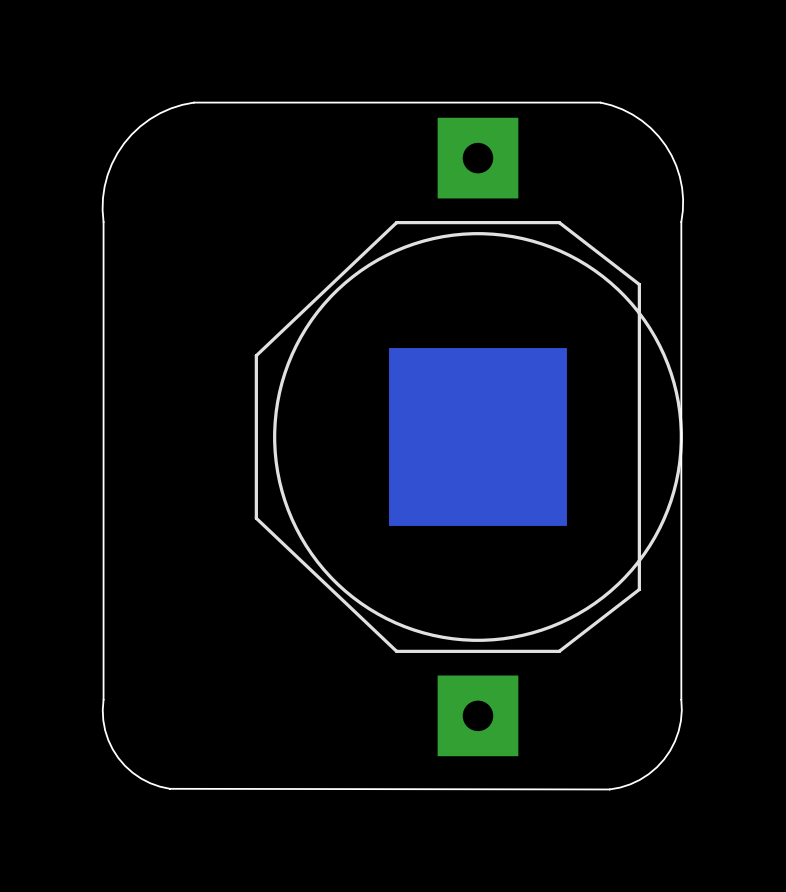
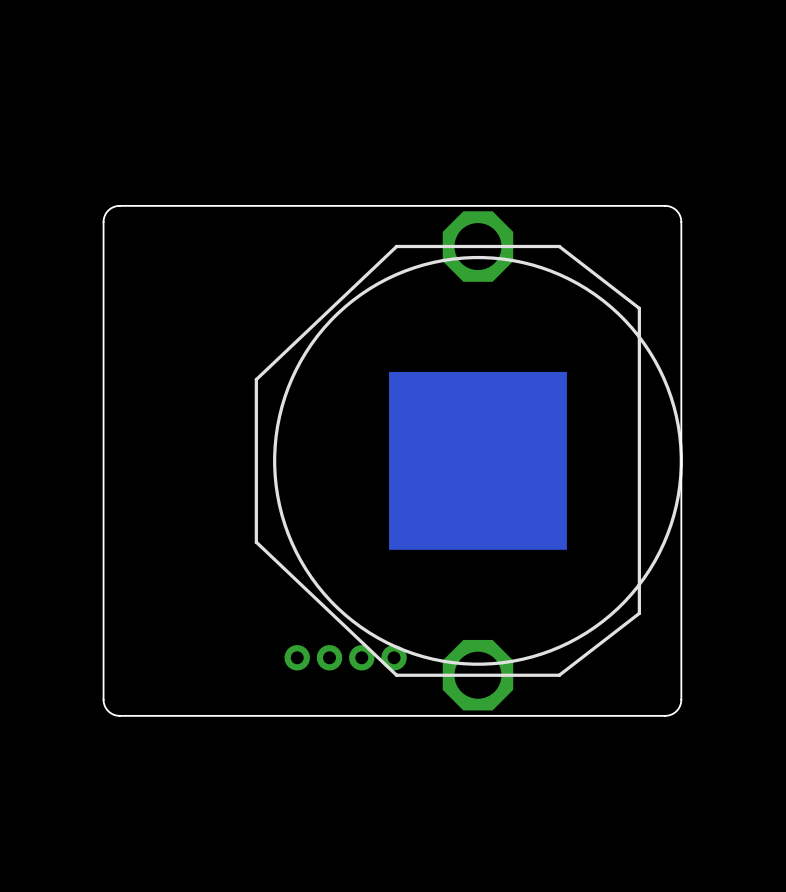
part footprint: [254, 117, 683, 757] -> [254, 211, 683, 711]
board edge: (681, 222) (683, 199) (679, 176) (665, 145) (642, 120) (622, 109) (600, 102) (193, 102) (182, 104) (149, 119) (124, 143) (107, 175) (102, 198) (103, 222) -> (681, 222) (676, 210) (665, 205) (119, 205) (108, 210) (103, 222)
part: none -> (345, 657)
board edge: (681, 699) (678, 731) (664, 759) (639, 779) (609, 789) (170, 788) (141, 778) (118, 758) (105, 730) (103, 699) -> (681, 699) (676, 711) (665, 715) (119, 715) (108, 711) (103, 699)

